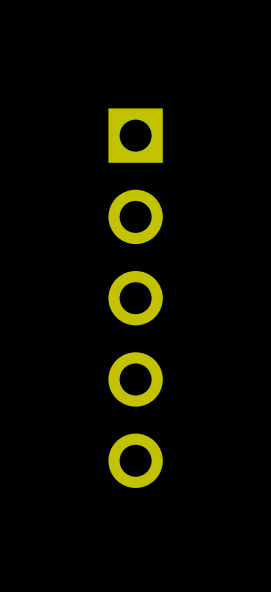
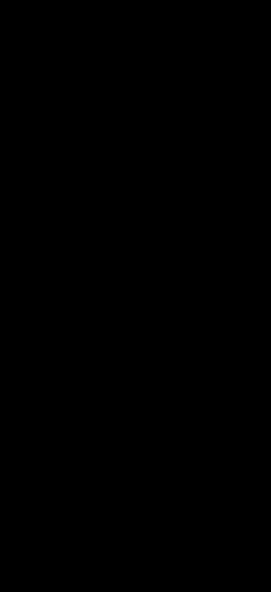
part: (135, 298) -> none

